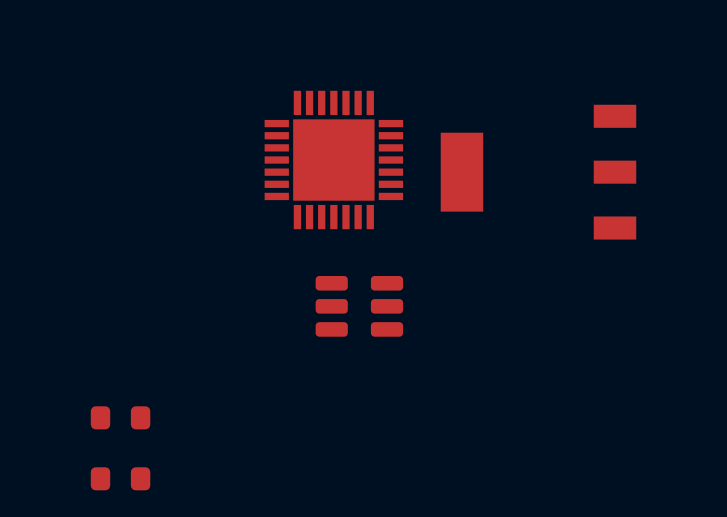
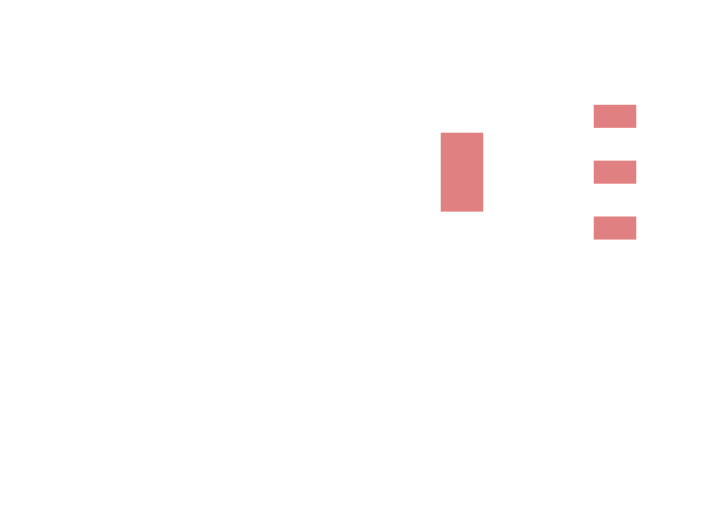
part: (333, 160) -> none
part: (359, 306) -> none
part: (120, 417) -> none
part: (120, 478) -> none

